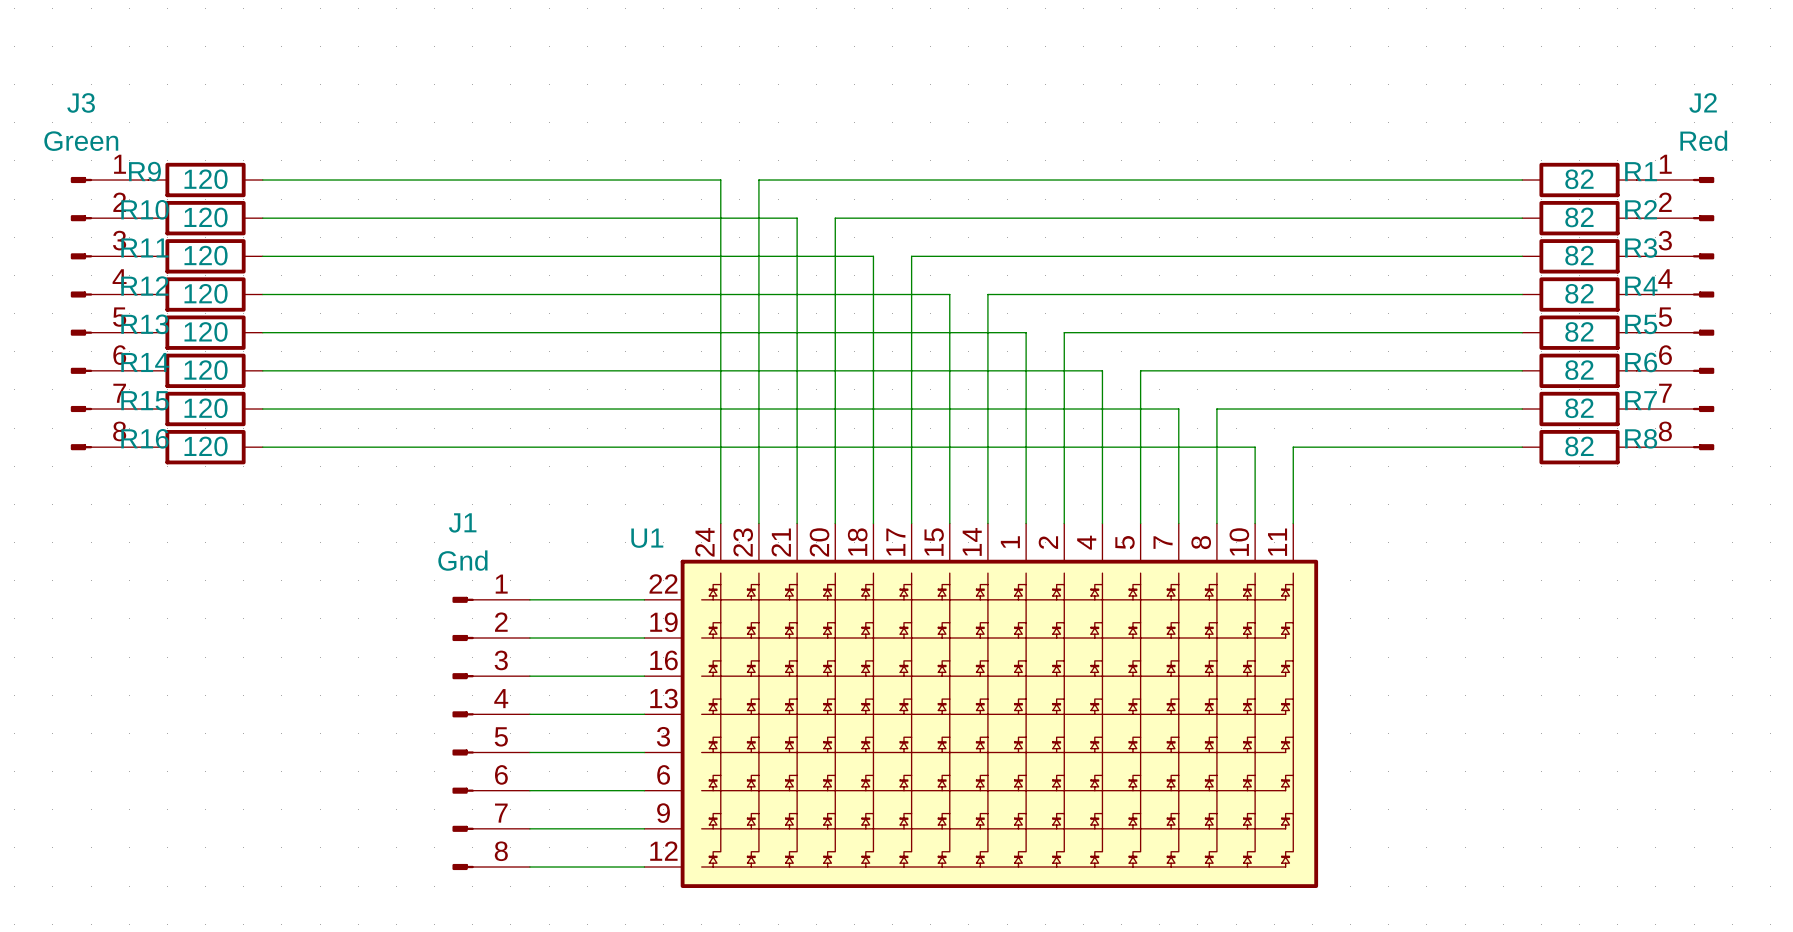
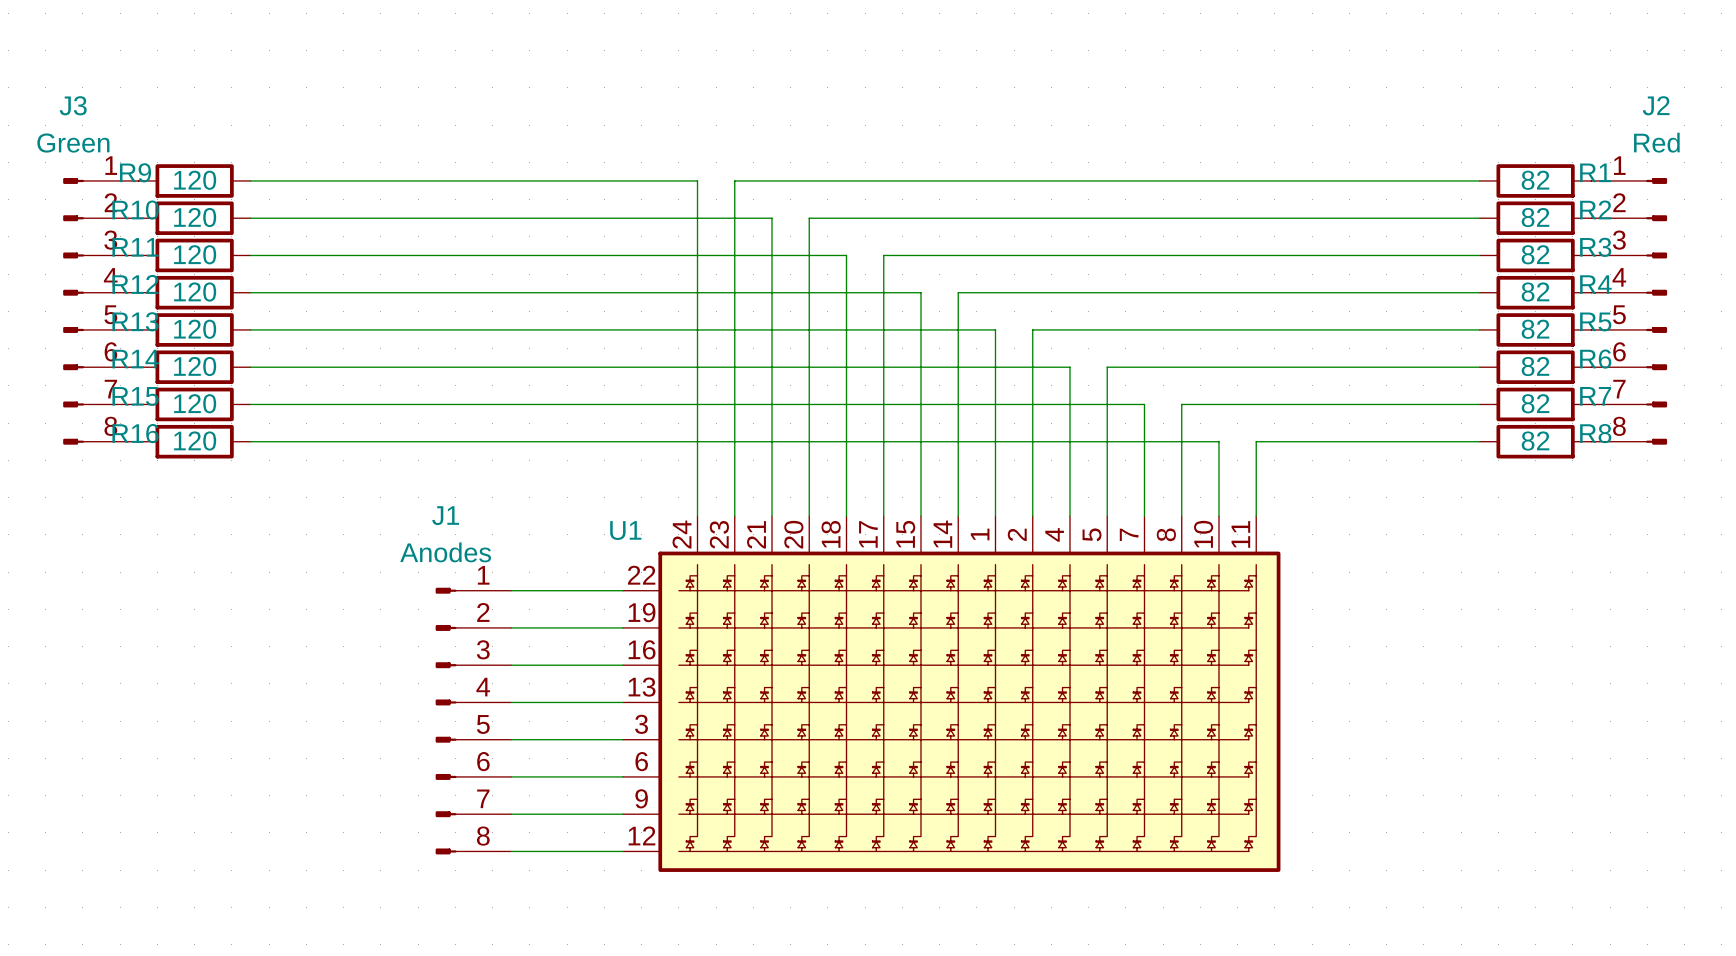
J1 value: Gnd (462, 560) -> Anodes (445, 552)

